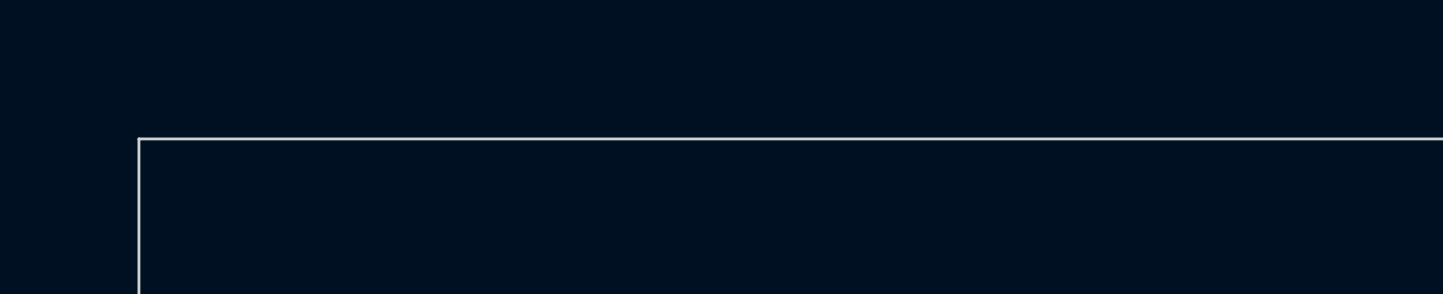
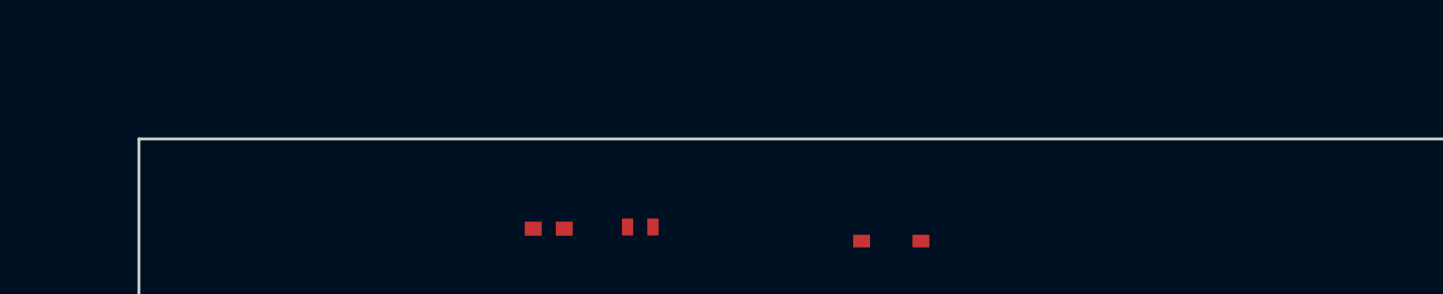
part: none -> (640, 226)
part: none -> (548, 228)
part: none -> (891, 241)

